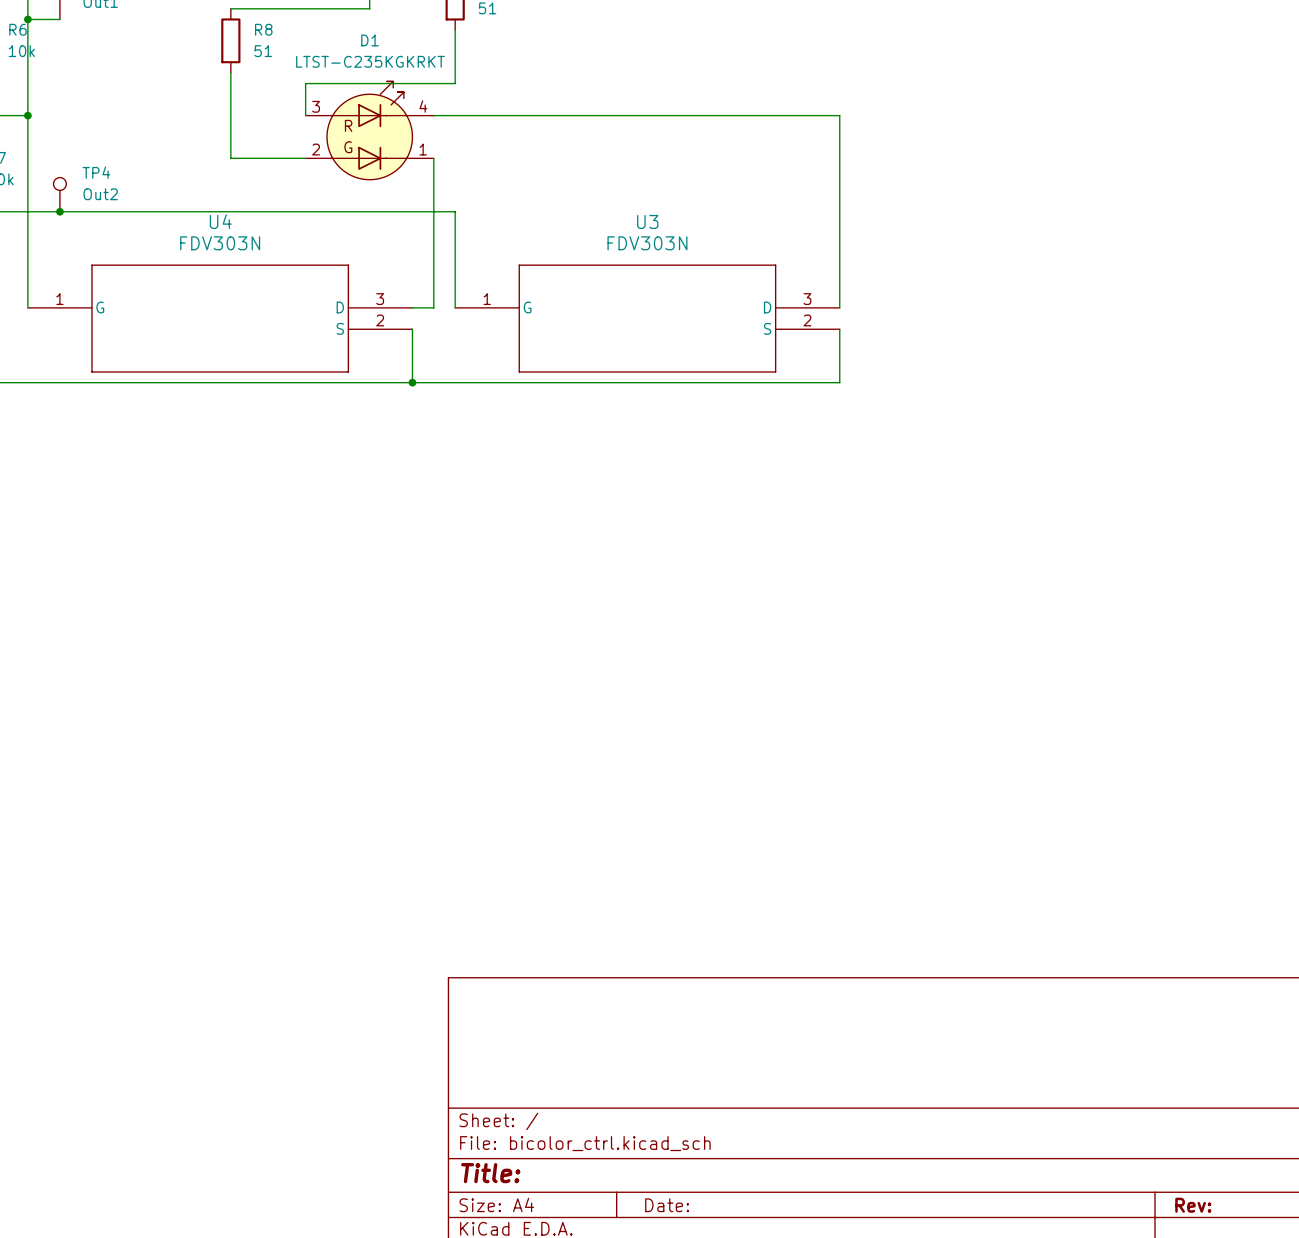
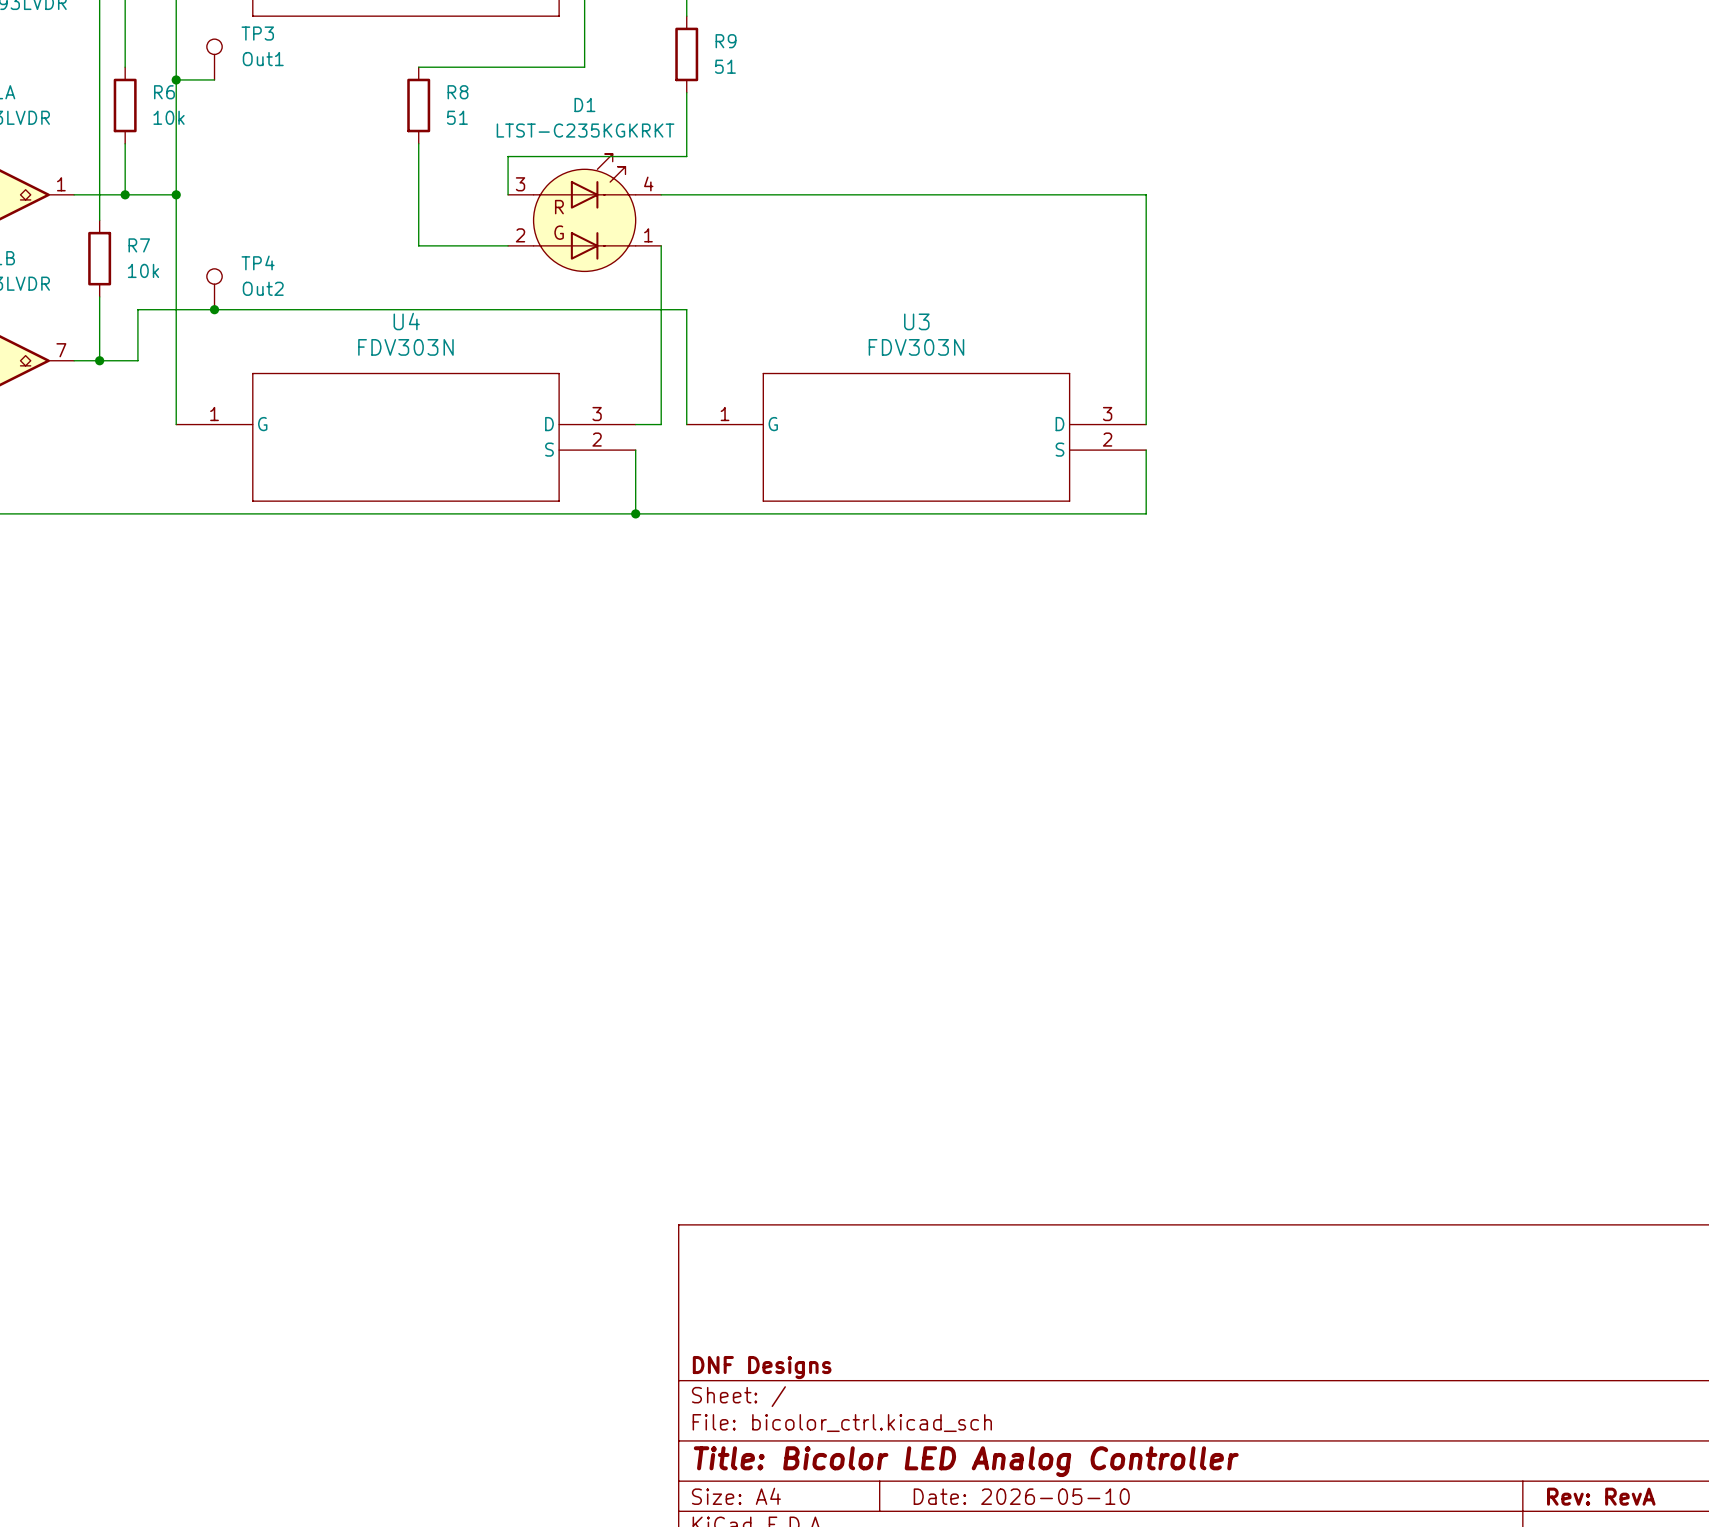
title block: none -> DNF Designs (762, 1367)
title block: Title: (490, 1173) -> Title: Bicolor LED Analog Controller (966, 1461)
title block: Date: (667, 1205) -> Date: 2026-05-10 (1021, 1496)
title block: Rev: (1193, 1205) -> Rev: RevA (1601, 1496)

